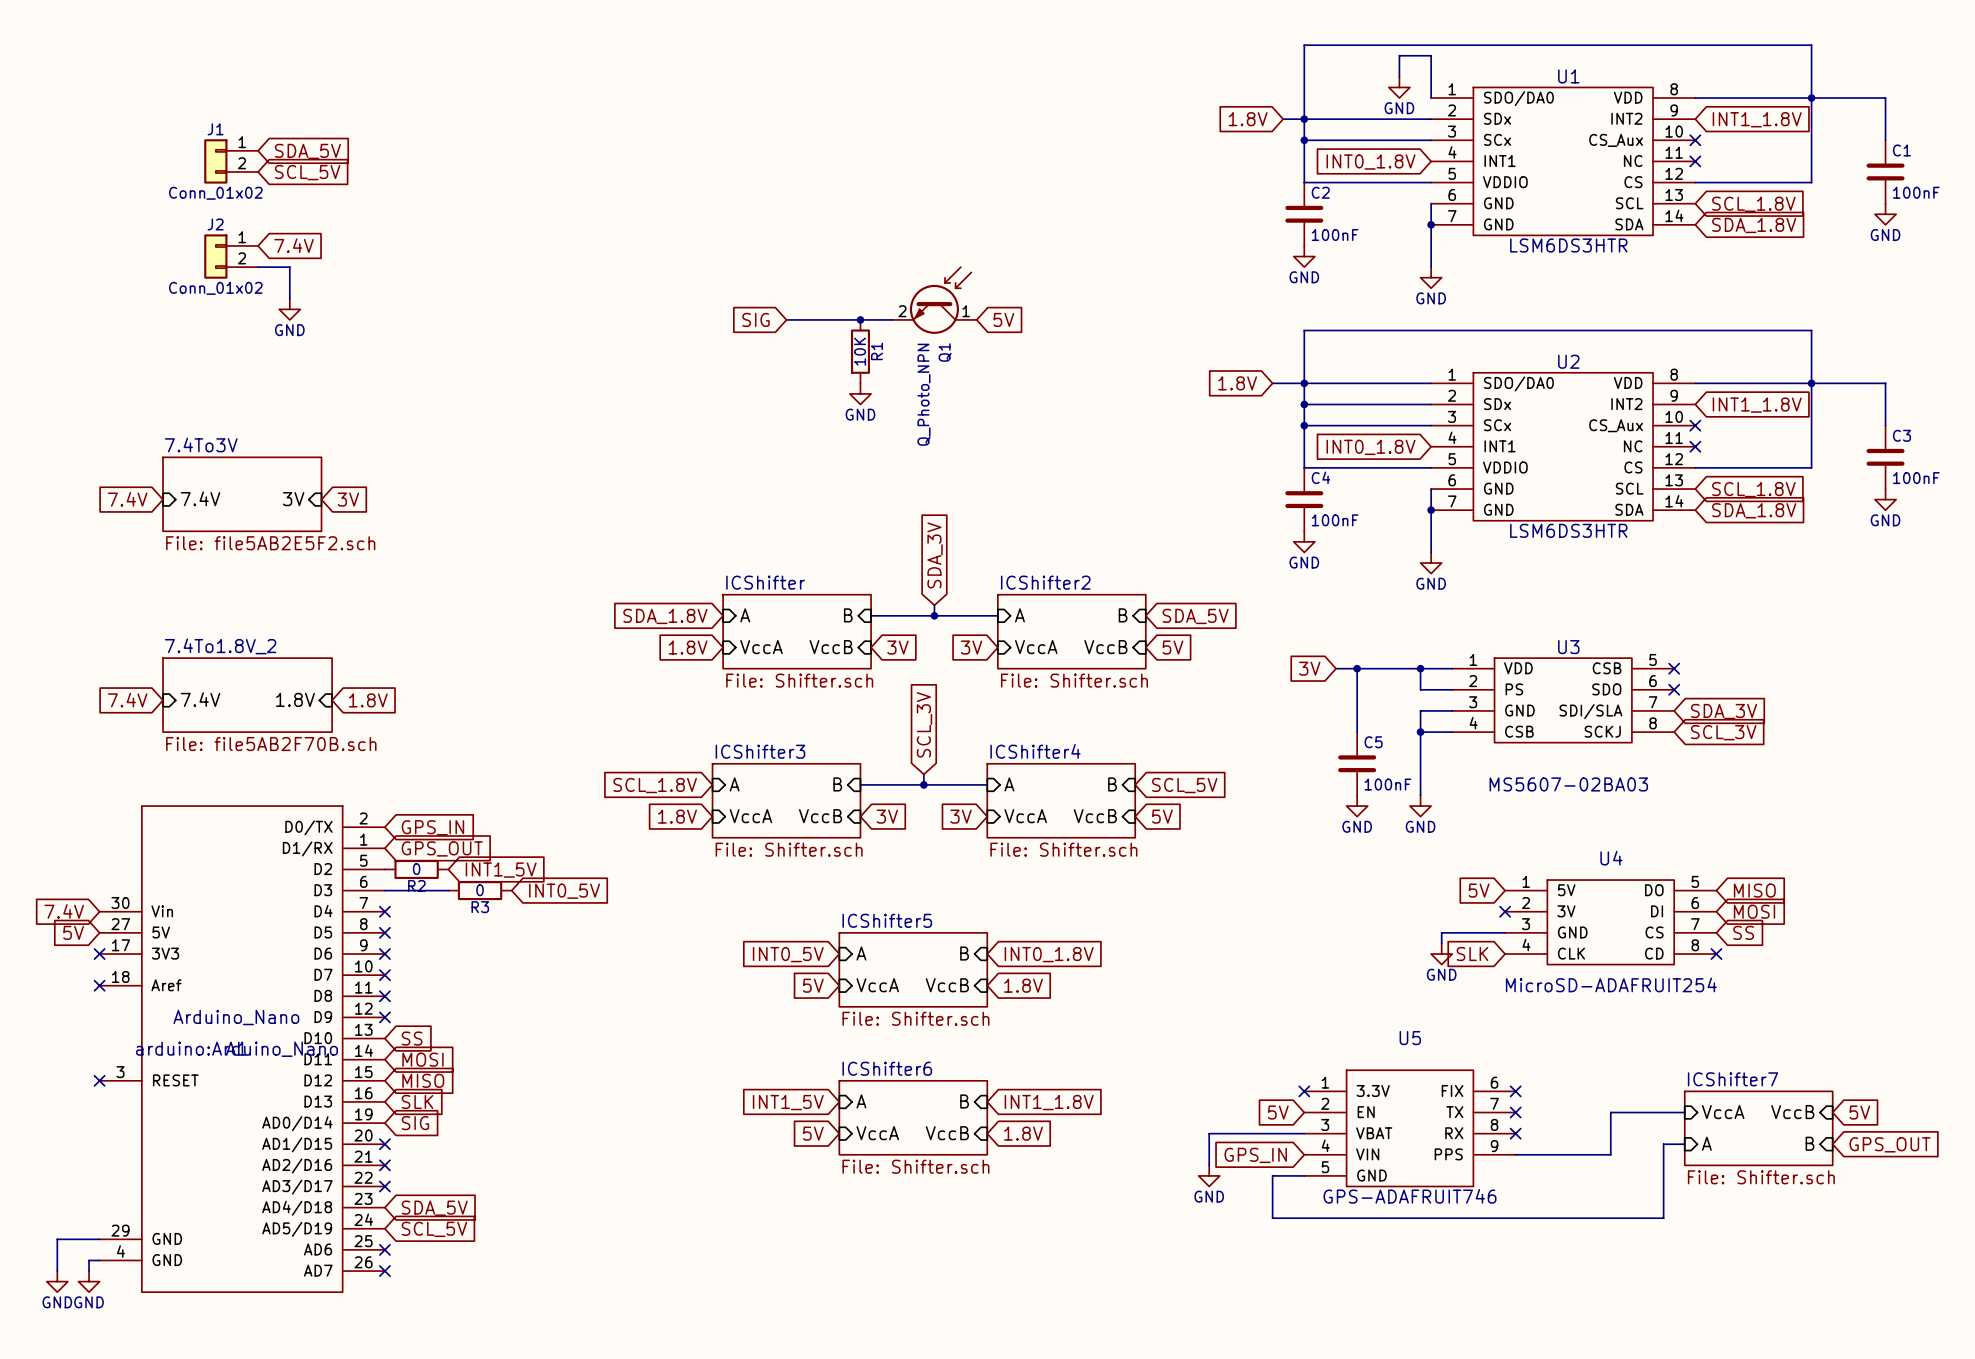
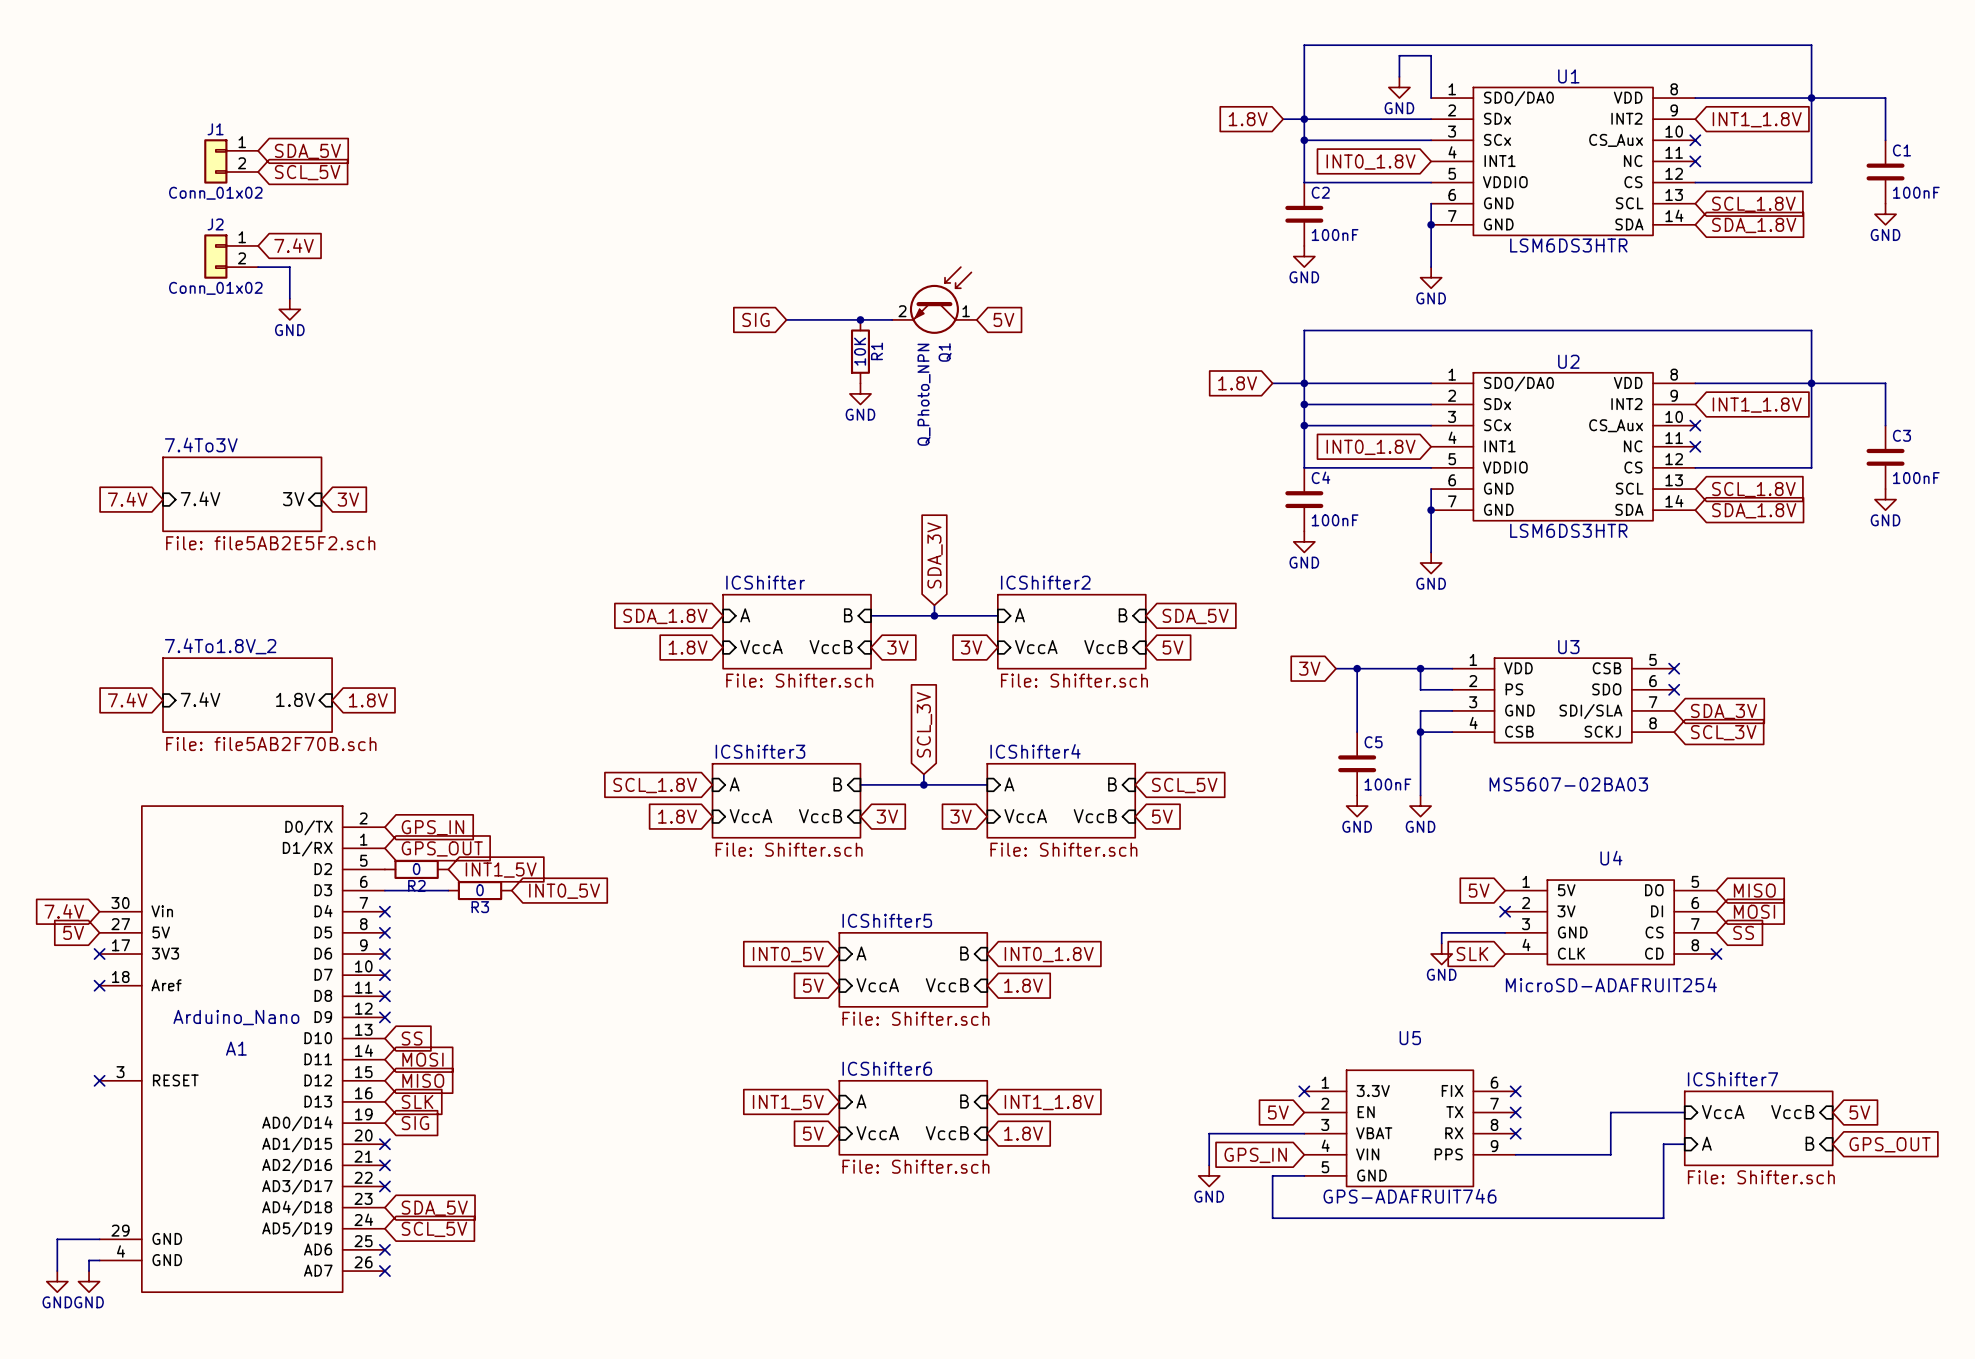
A1 text: arduino:Arduino_Nano (236, 1049) -> none

